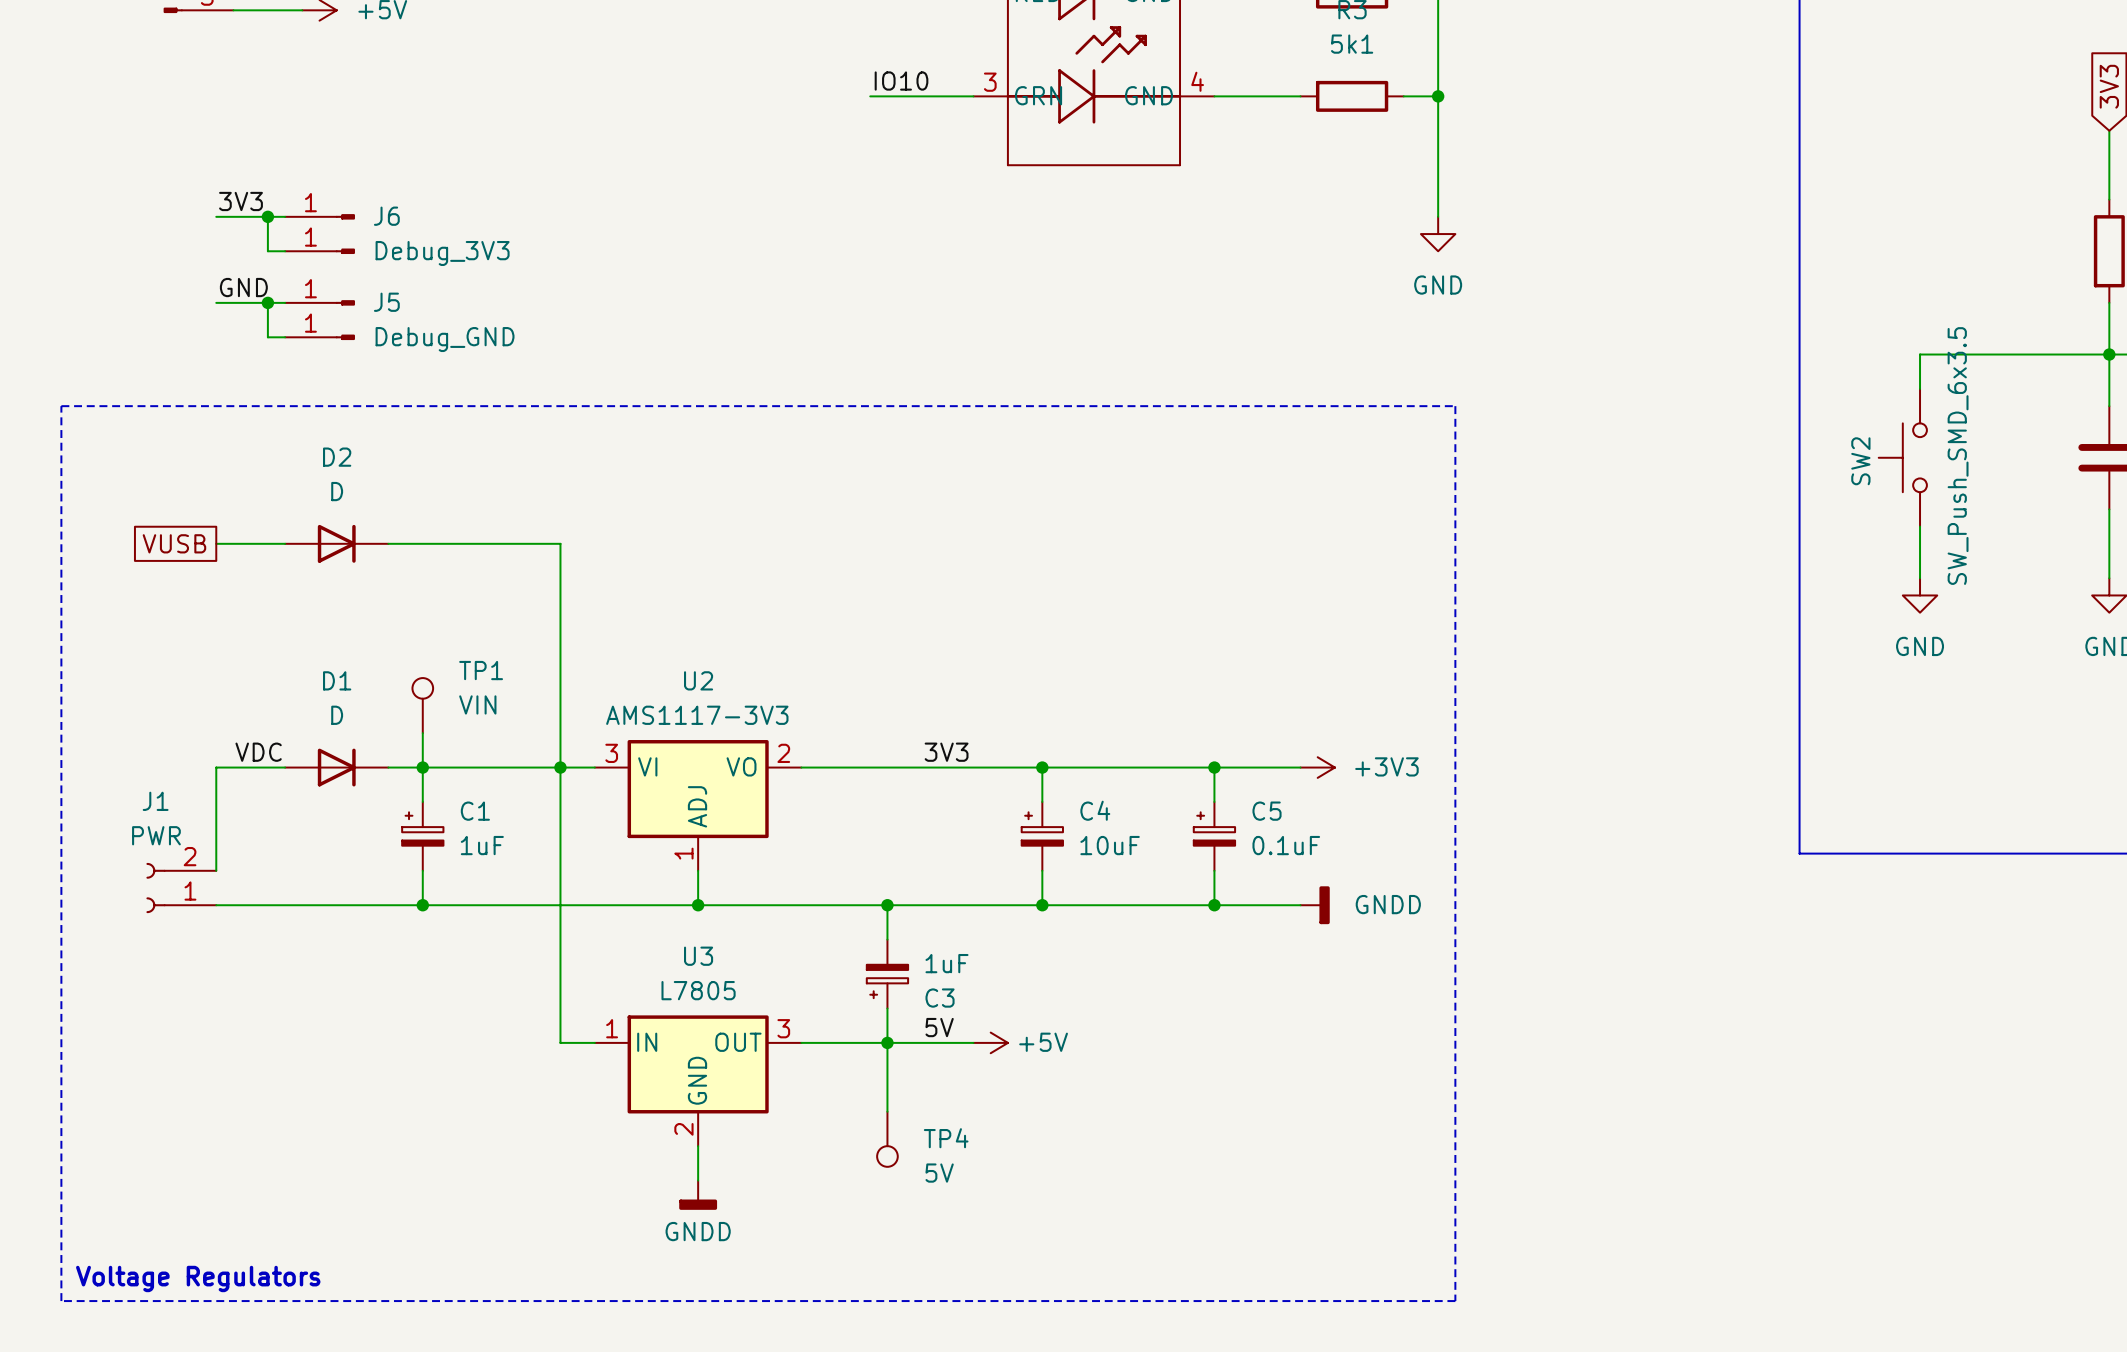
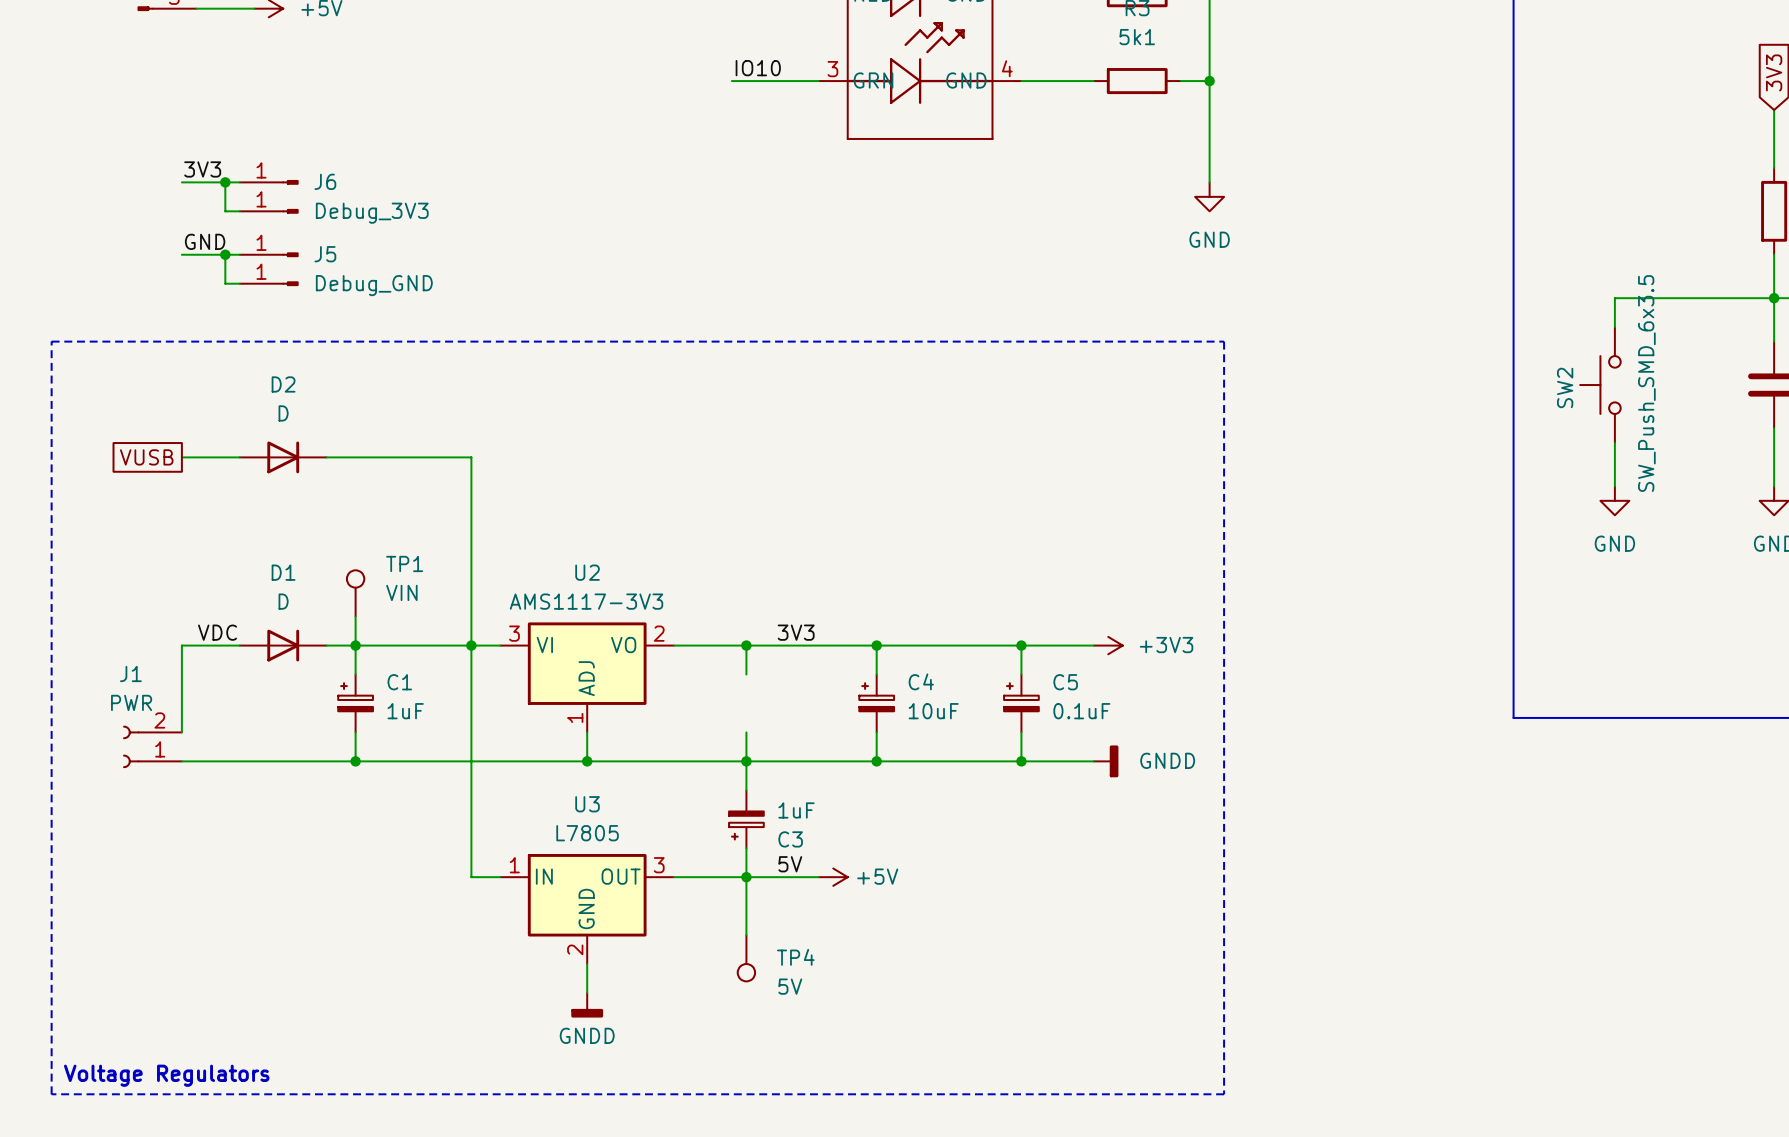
wire: none -> (746, 645) (746, 674)
junction: none -> (746, 645)
wire: none -> (746, 732) (746, 761)

